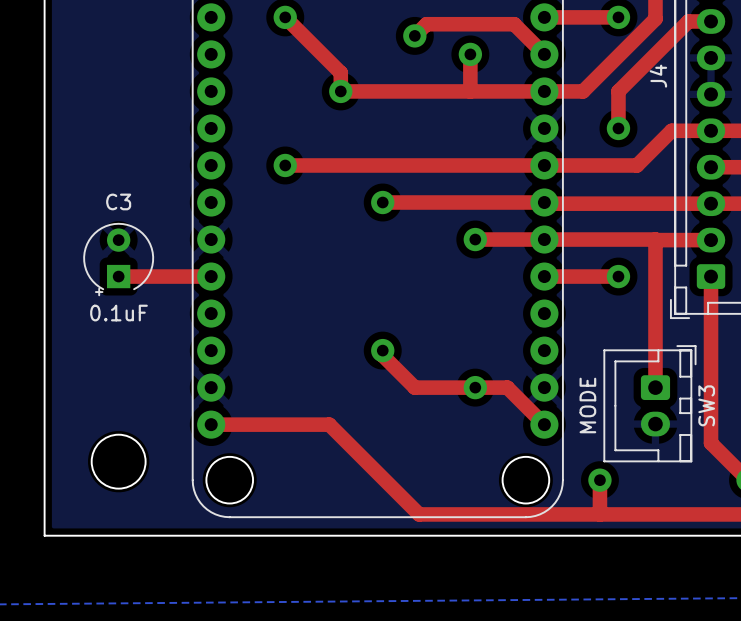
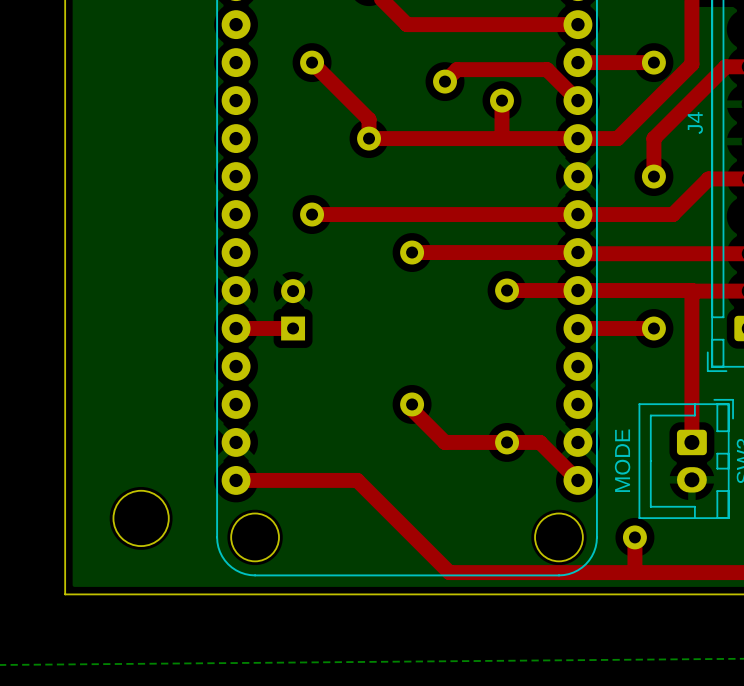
C3 side: top (118, 259) -> bottom (293, 309)
top track: (118, 276) (211, 276) -> (293, 328) (236, 328)

